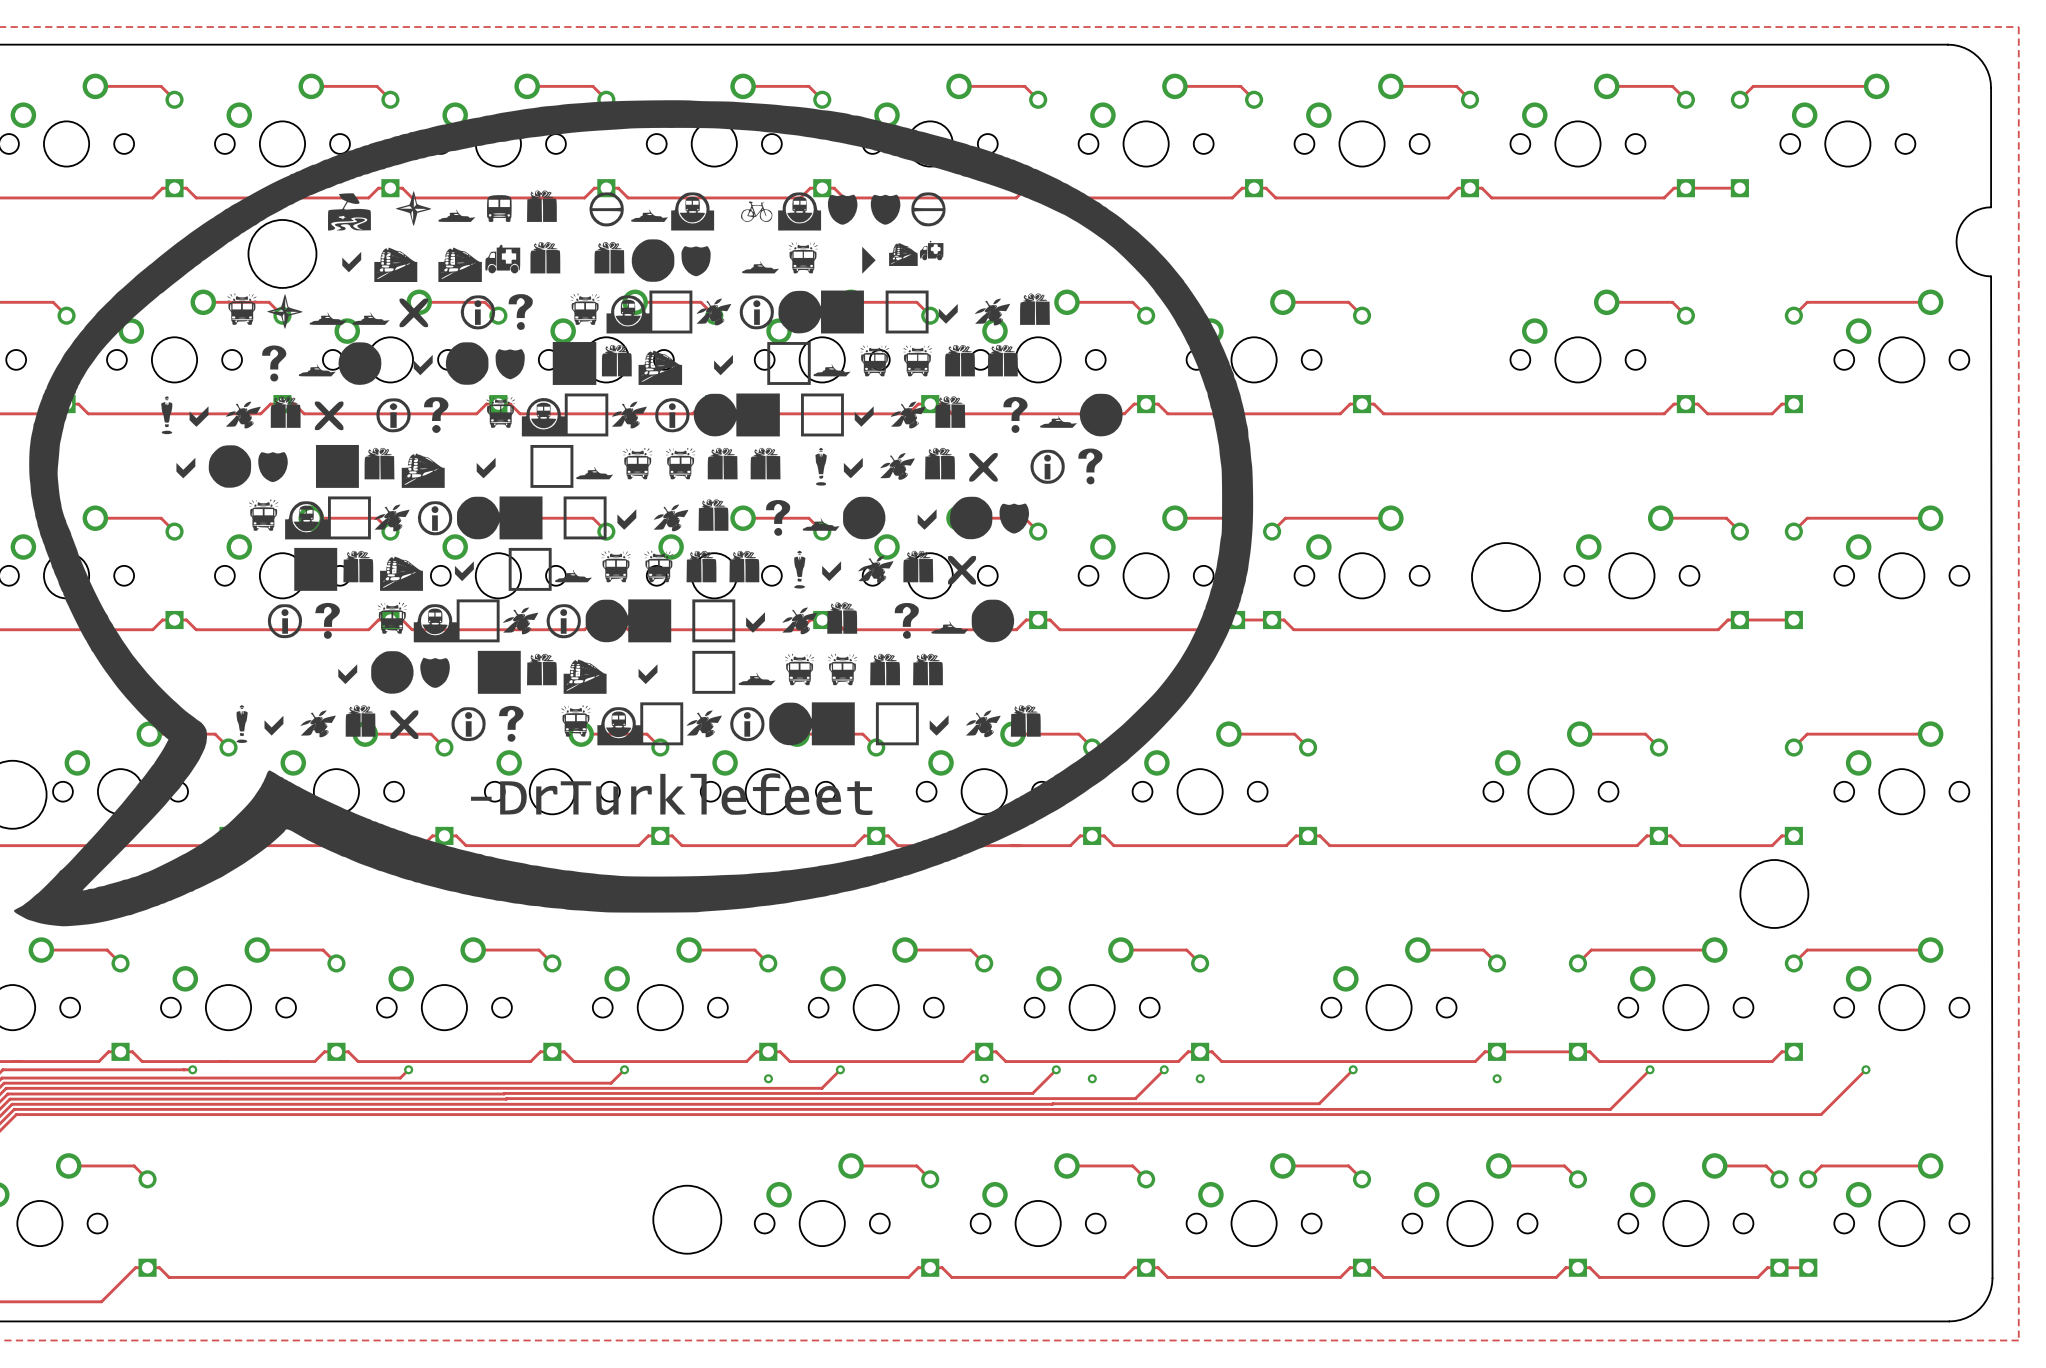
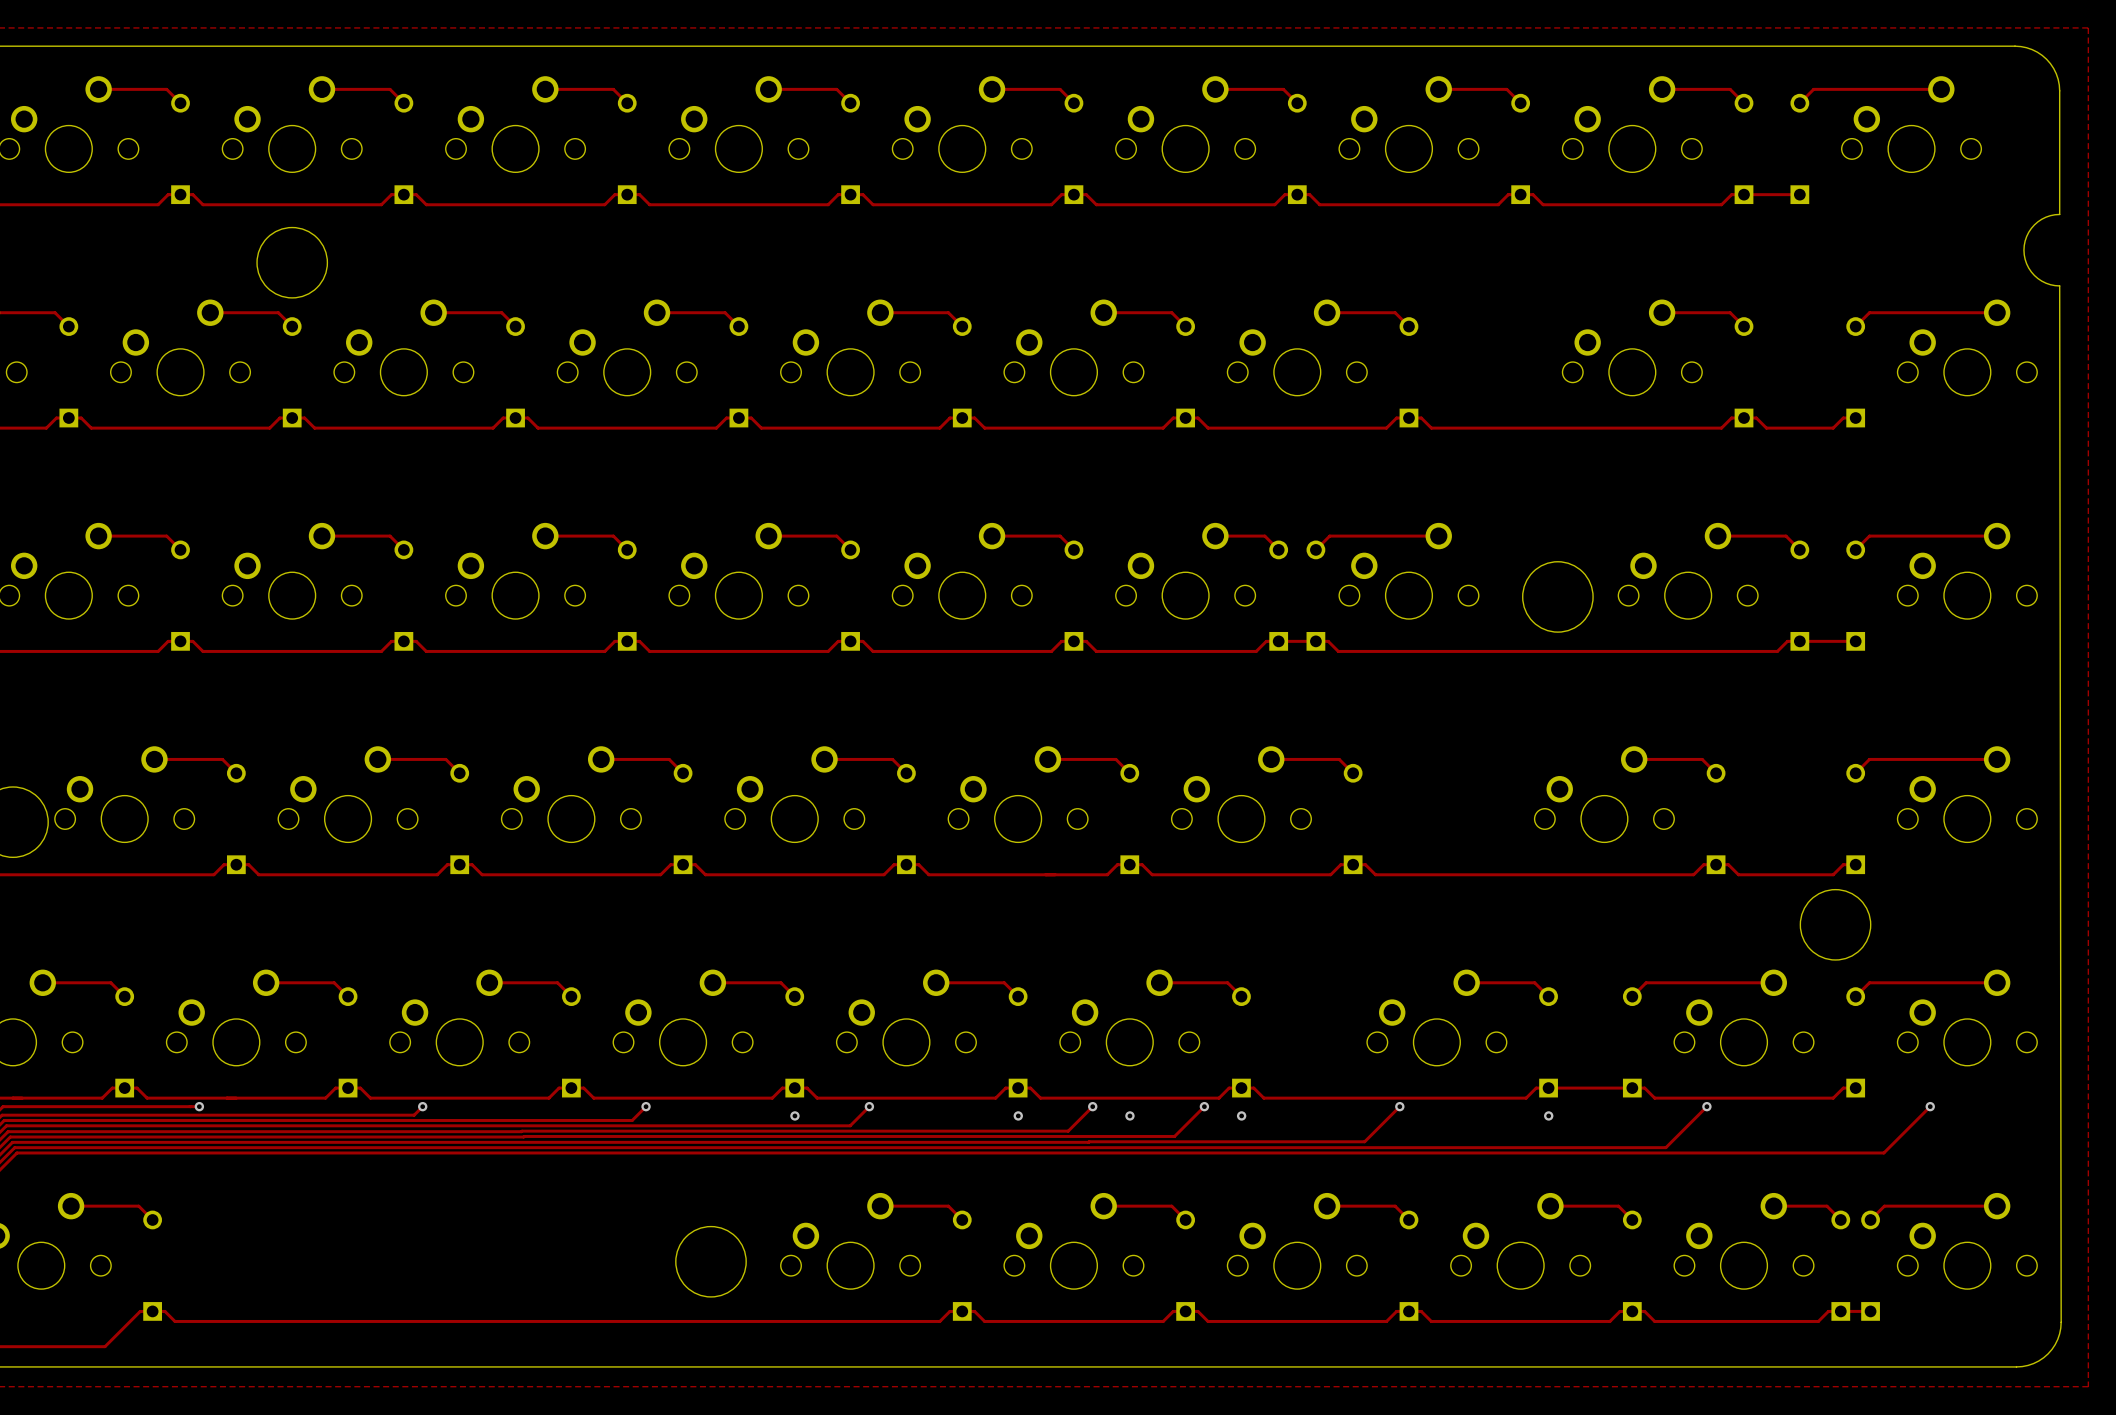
drawing: [13, 100, 1254, 927] -> none

